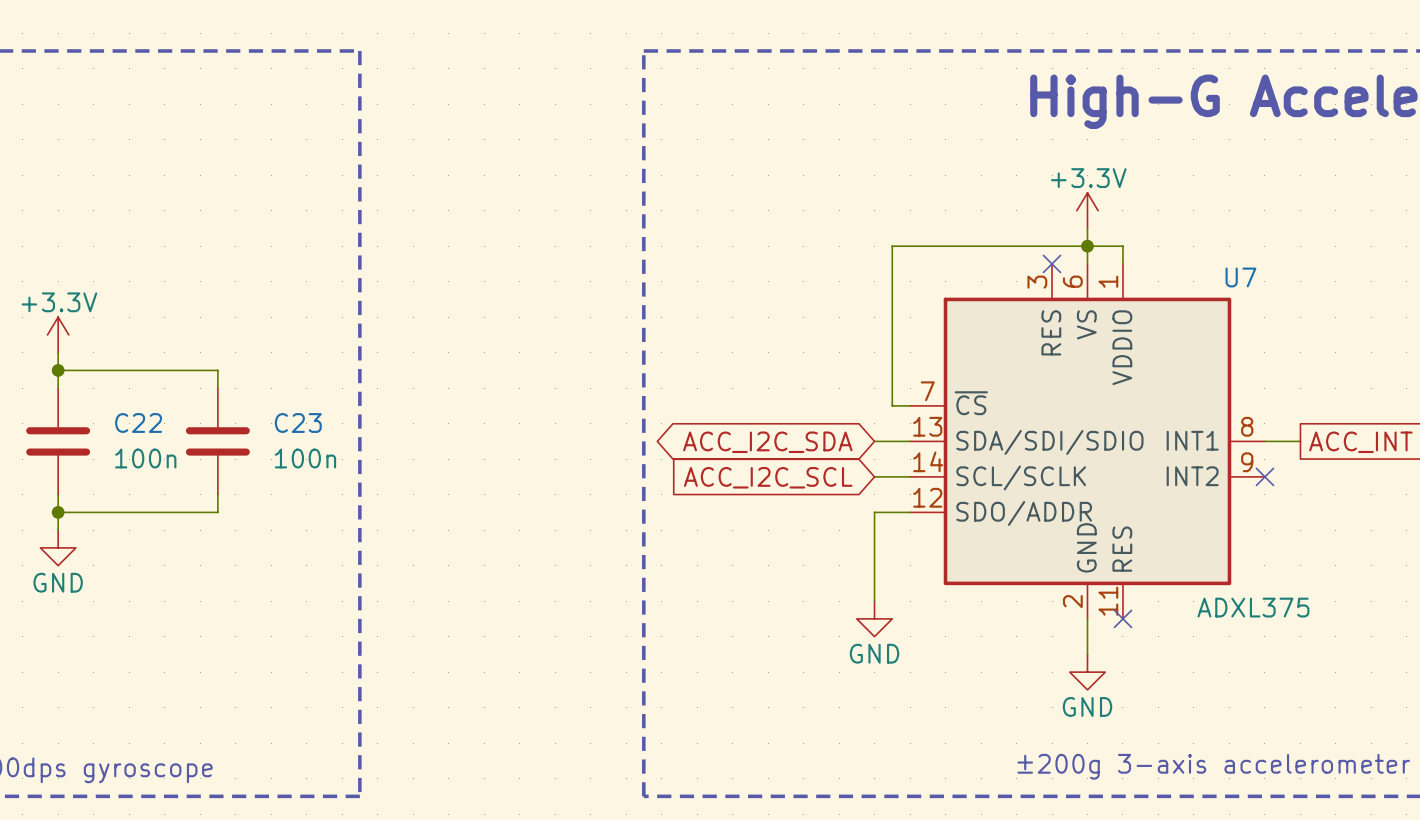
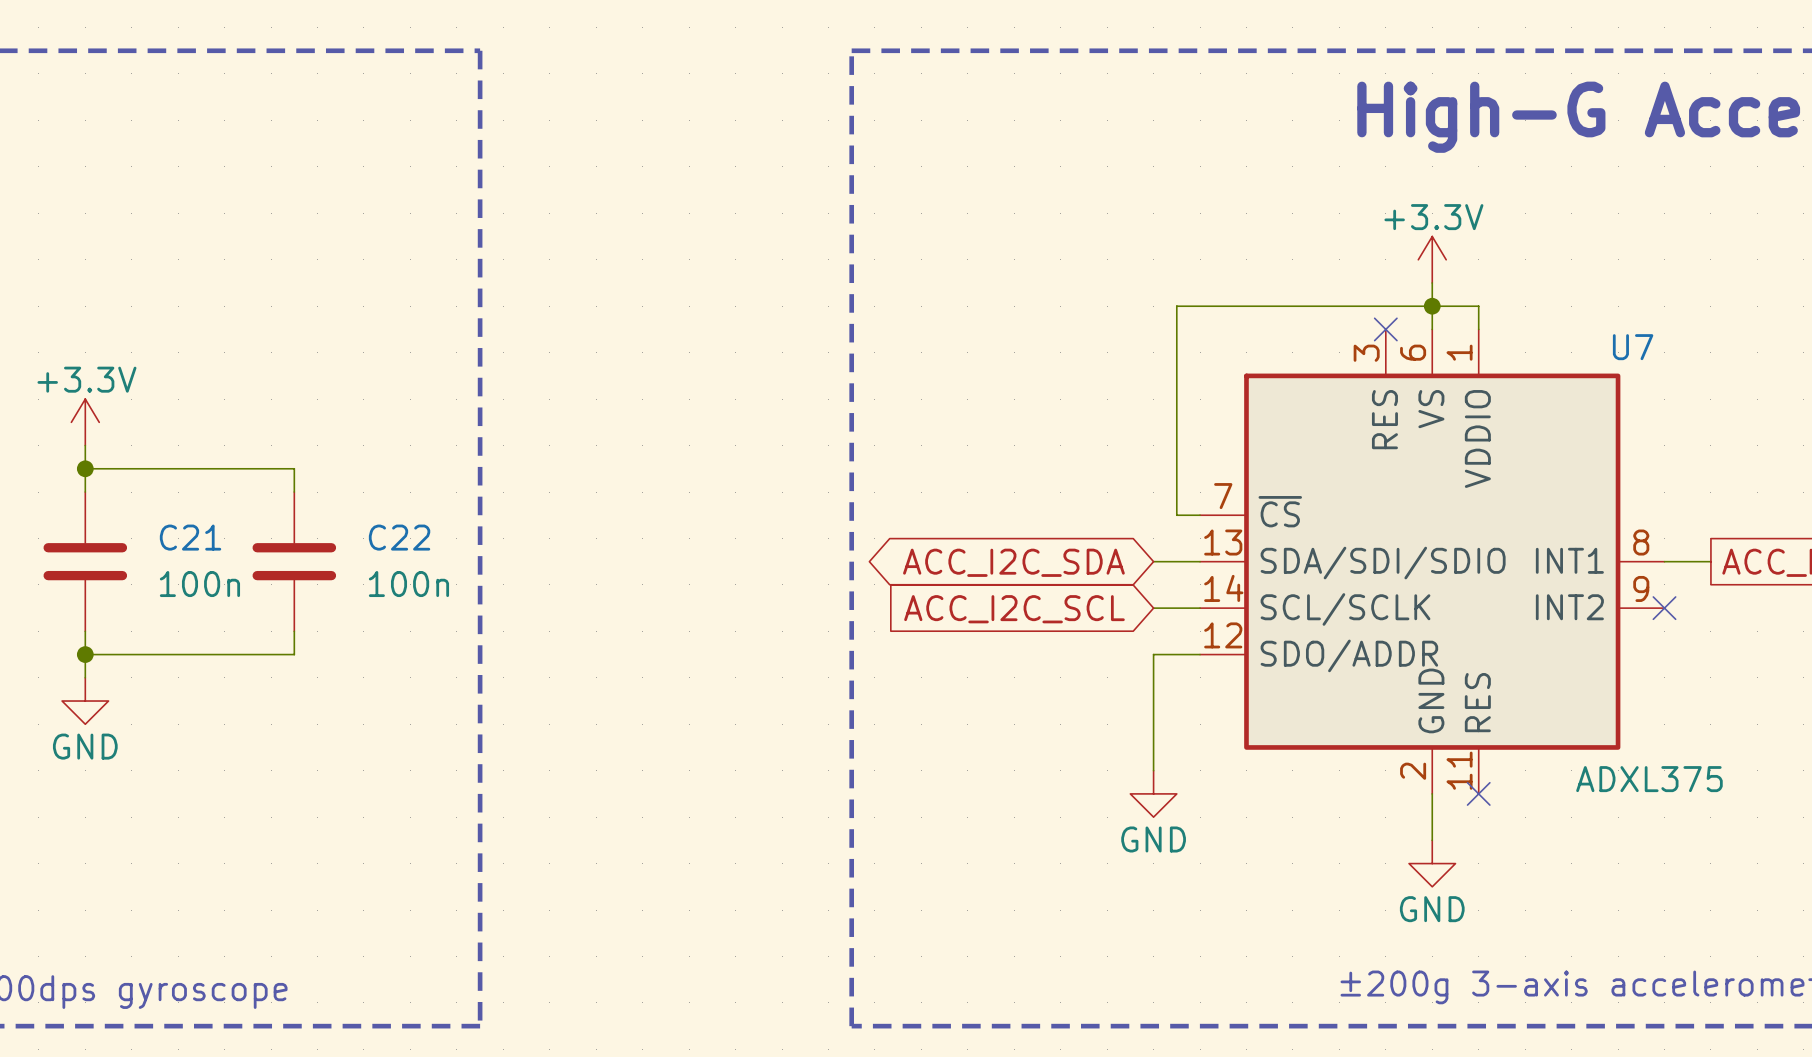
C22 name: C22 (138, 423) -> C21 (190, 537)
C23 name: C23 (298, 423) -> C22 (399, 537)

